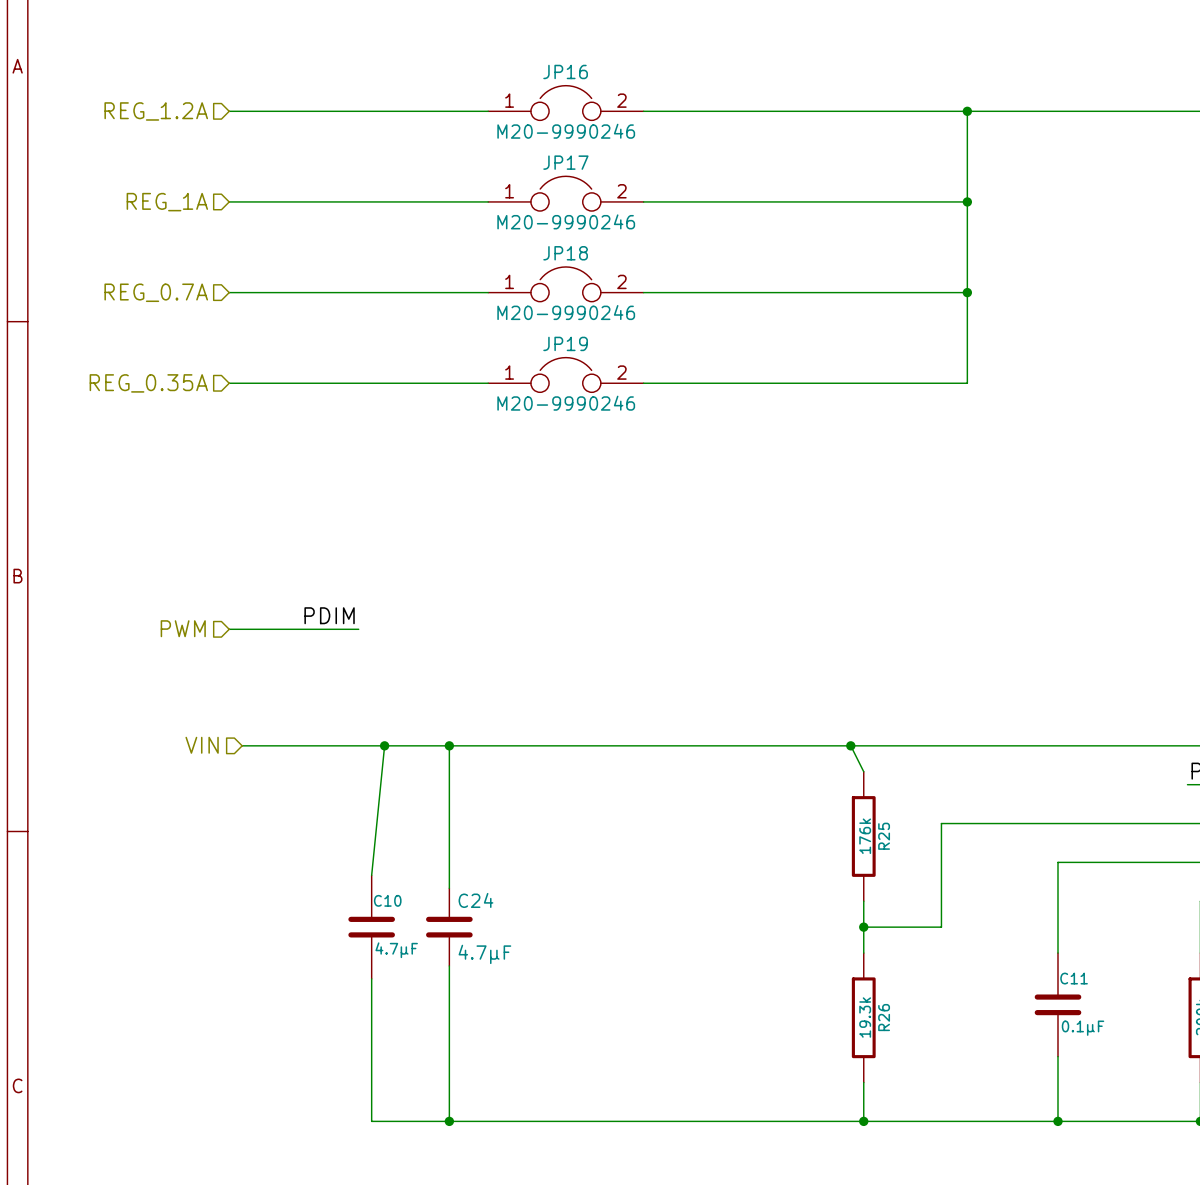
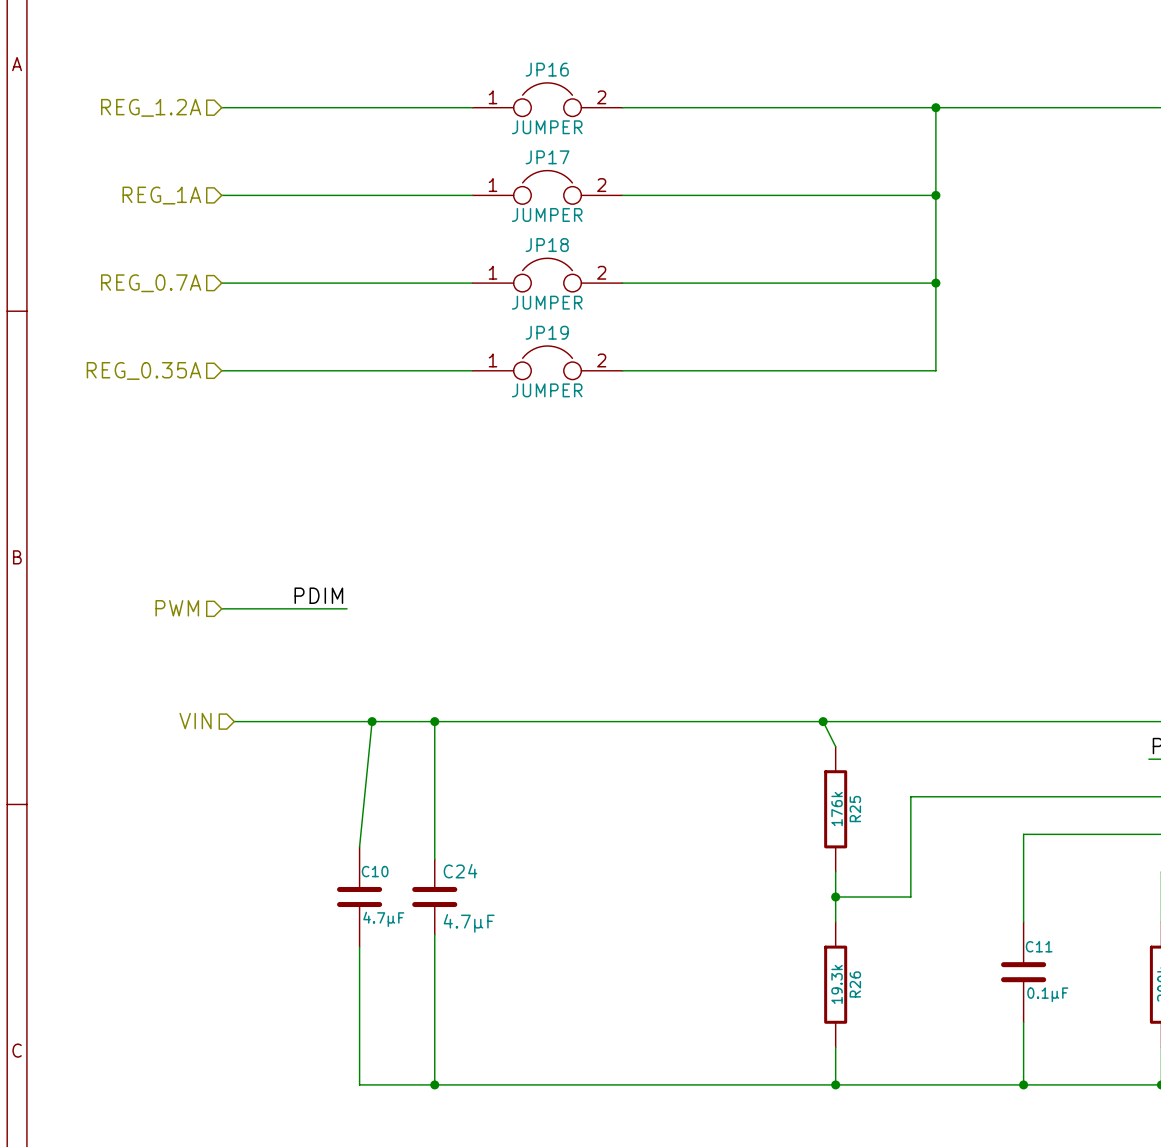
JP16 value: M20-9990246 (566, 131) -> JUMPER (547, 127)
JP17 value: M20-9990246 (566, 221) -> JUMPER (547, 214)
JP18 value: M20-9990246 (566, 312) -> JUMPER (547, 302)
JP19 value: M20-9990246 (566, 403) -> JUMPER (547, 390)

